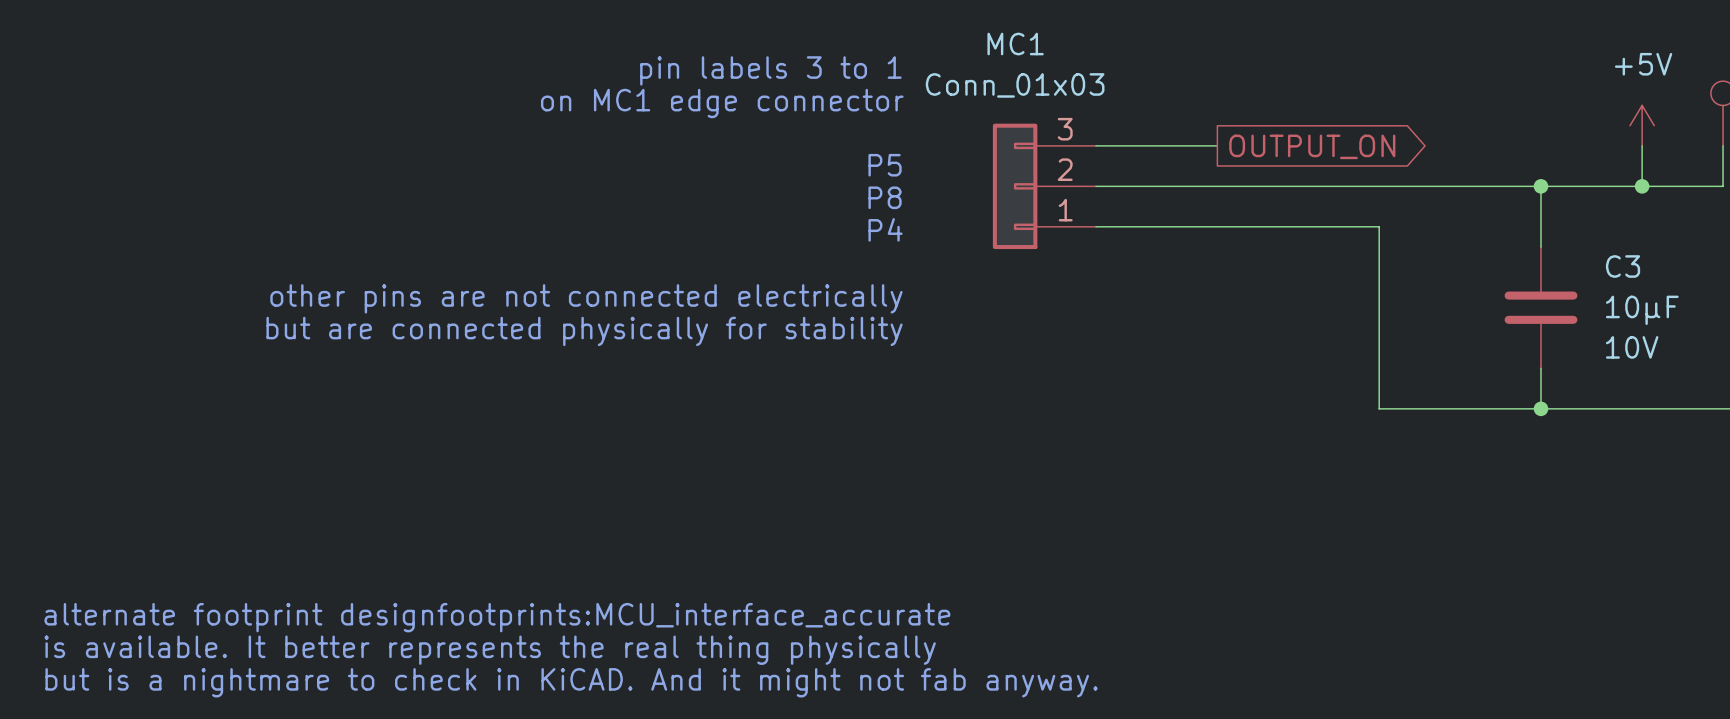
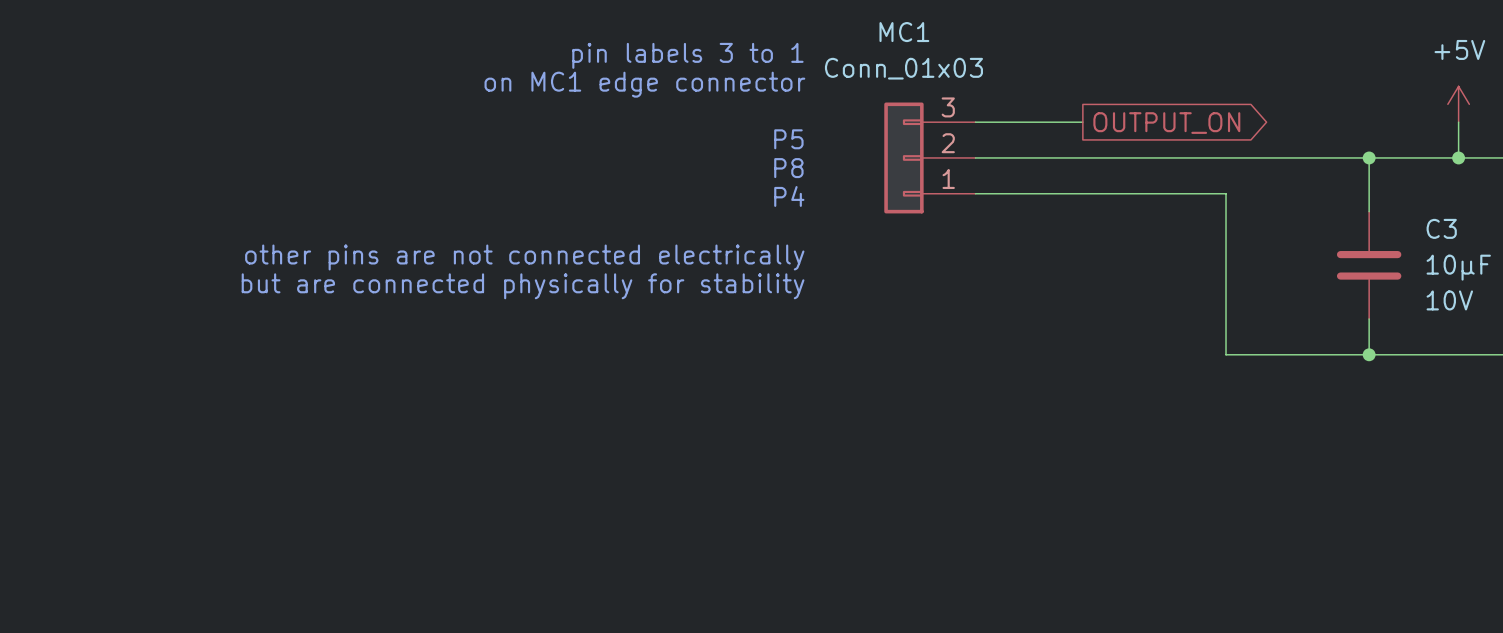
text: alternate footprint designfootprints:MCU_interface_accurate (497, 617) -> none
text: is available. It better represents the real thing physically (490, 650) -> none
text: but is a nightmare to check in KiCAD. And it might not fab anyway. (571, 682) -> none

